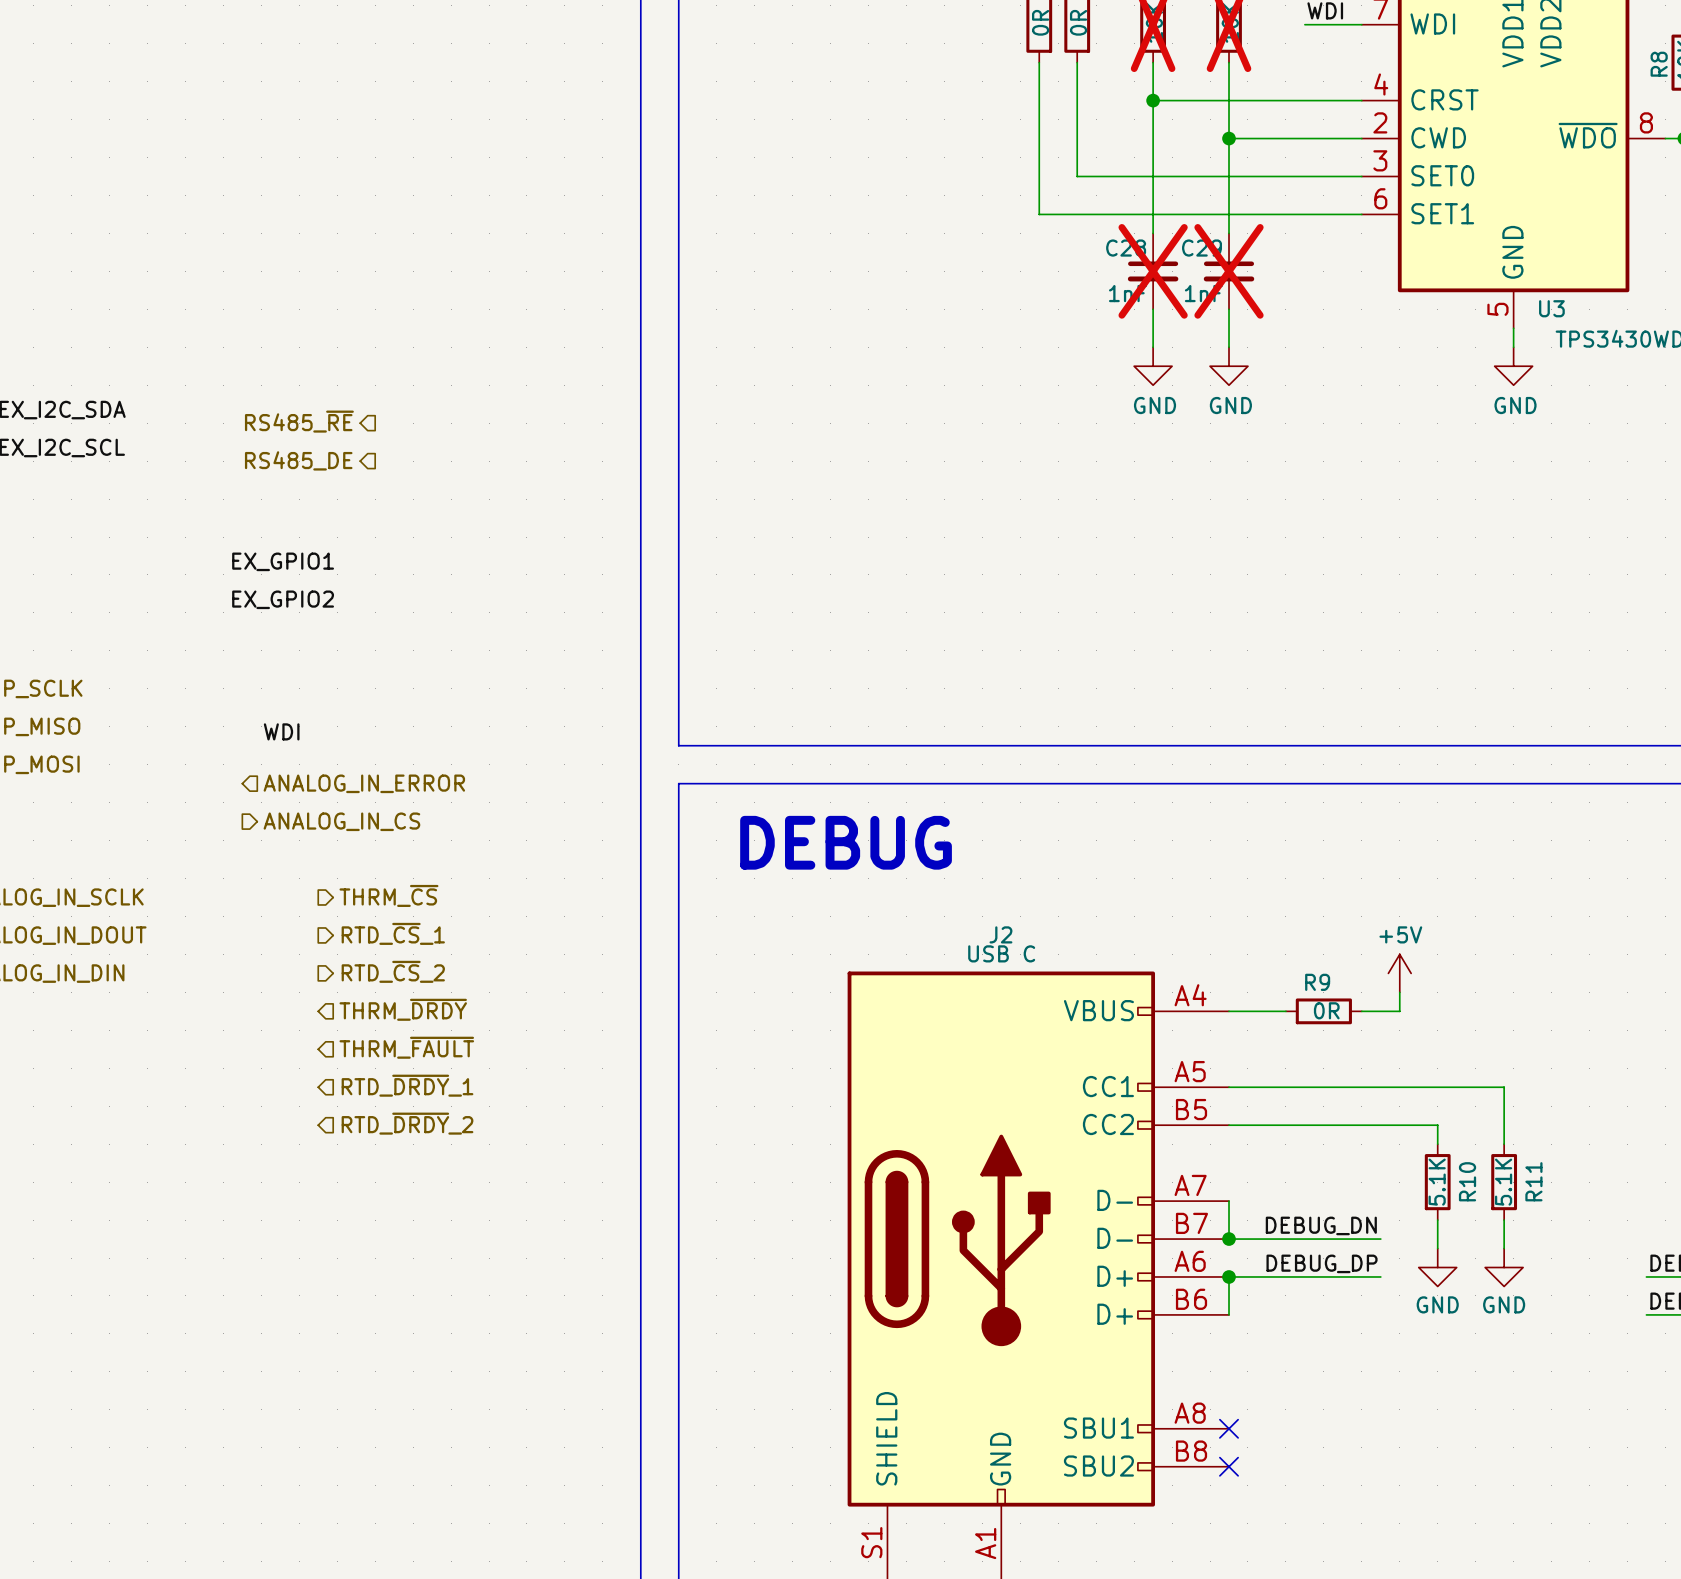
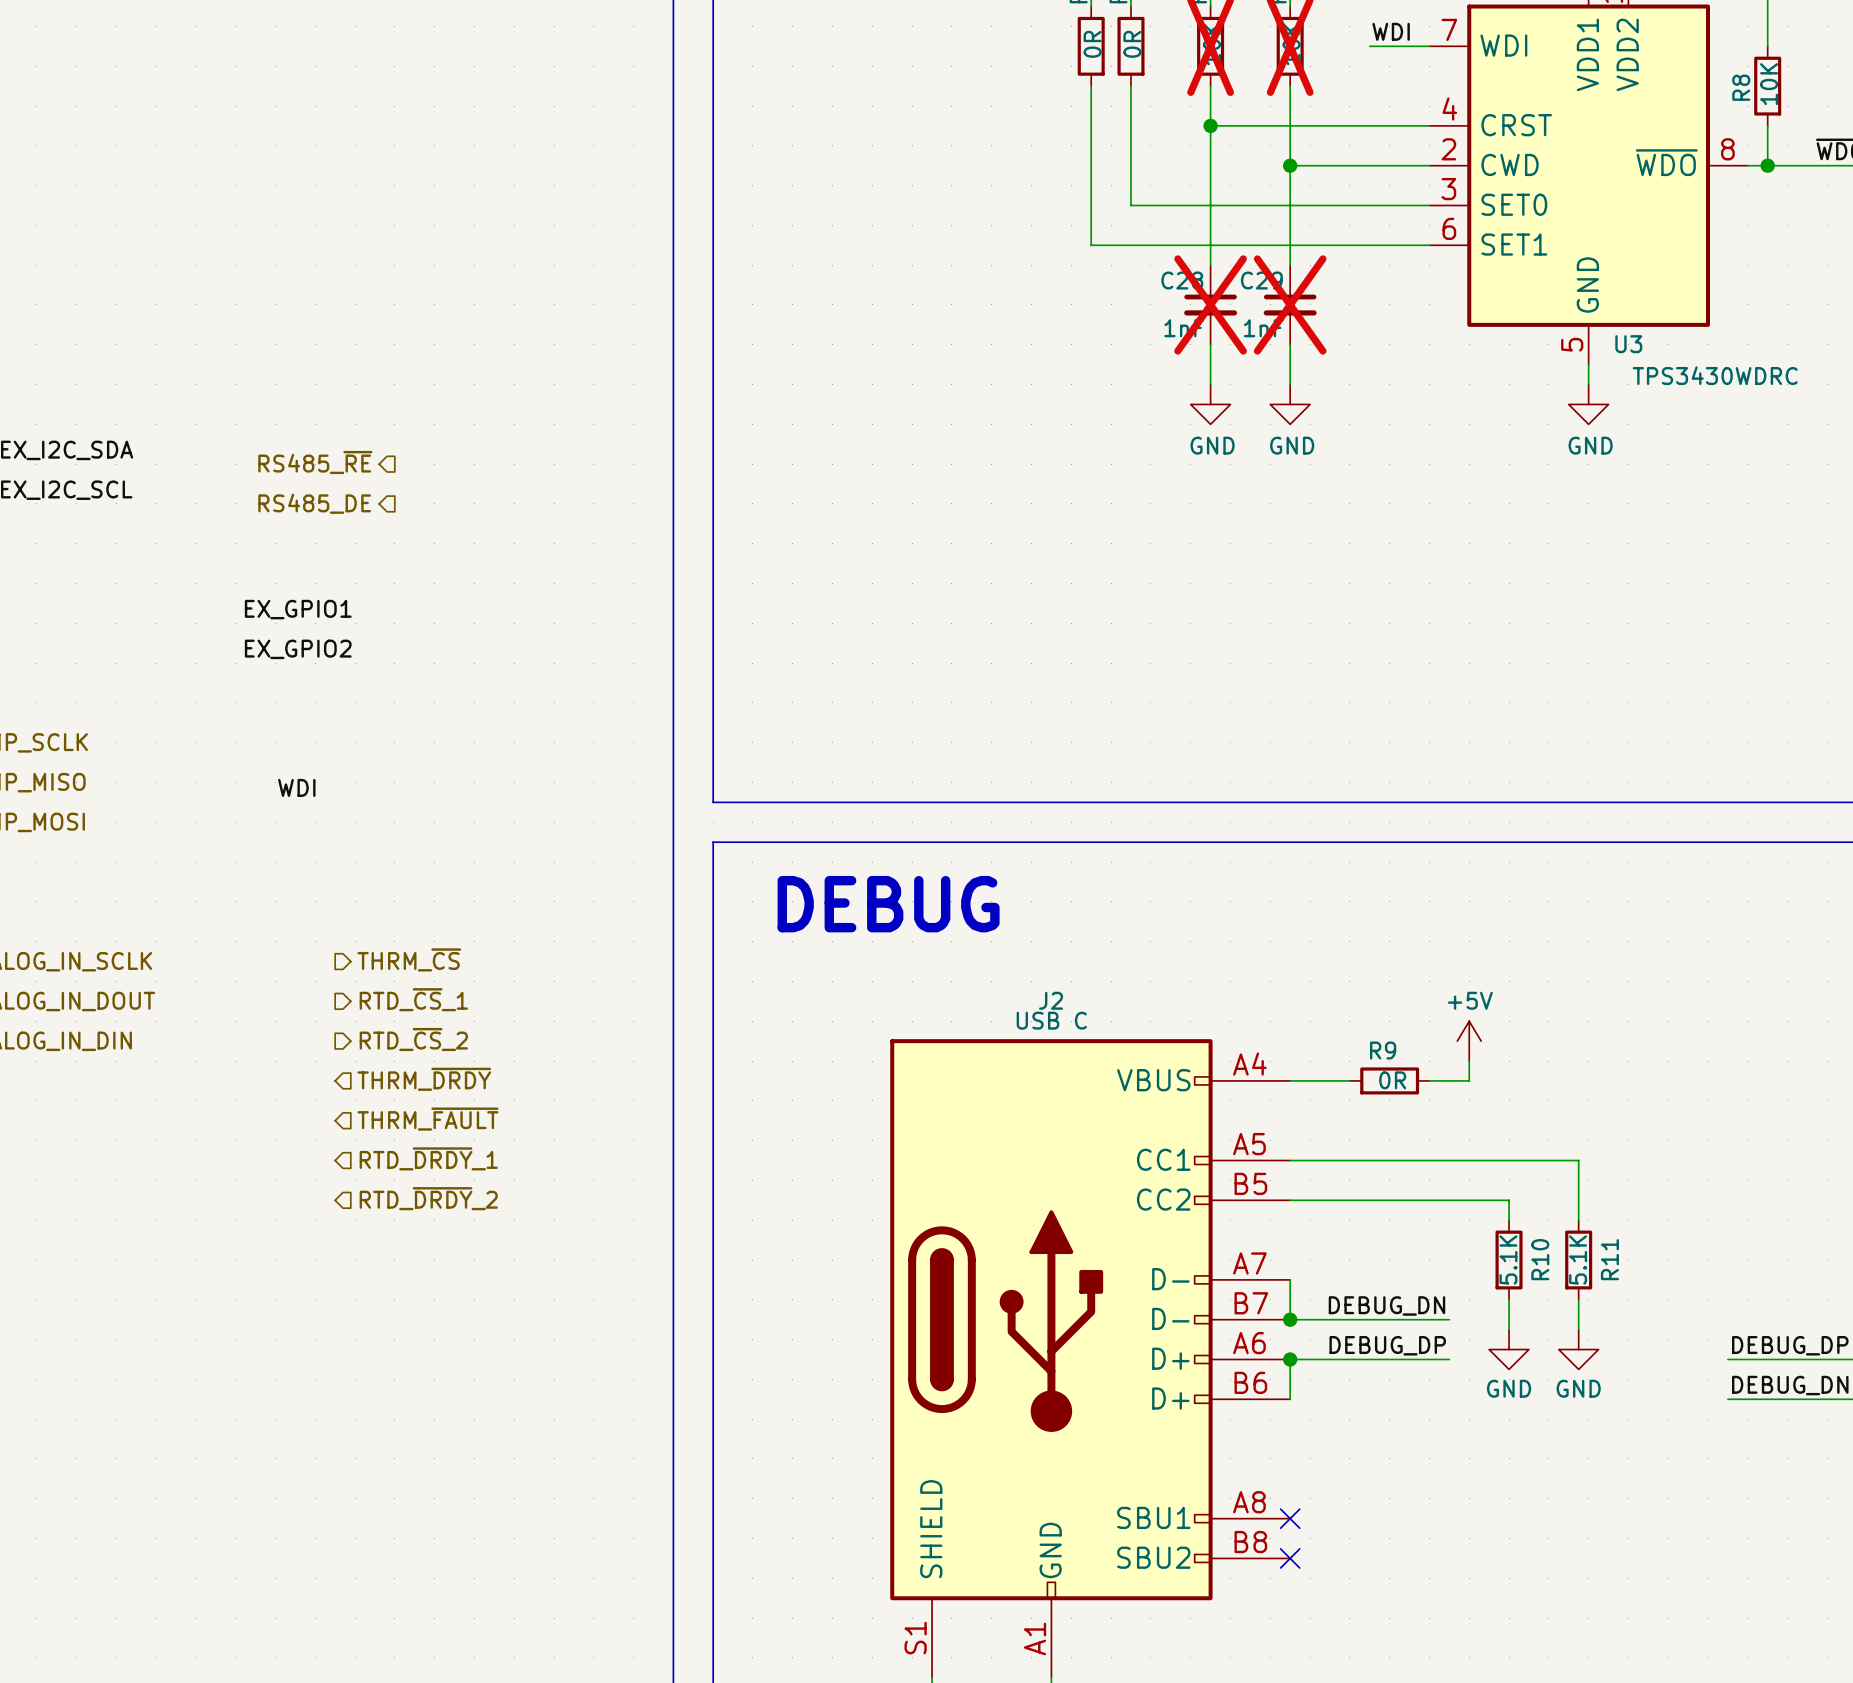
hierarchical label: ANALOG_IN_ERROR (364, 783) -> none
hierarchical label: ANALOG_IN_CS (341, 821) -> none

